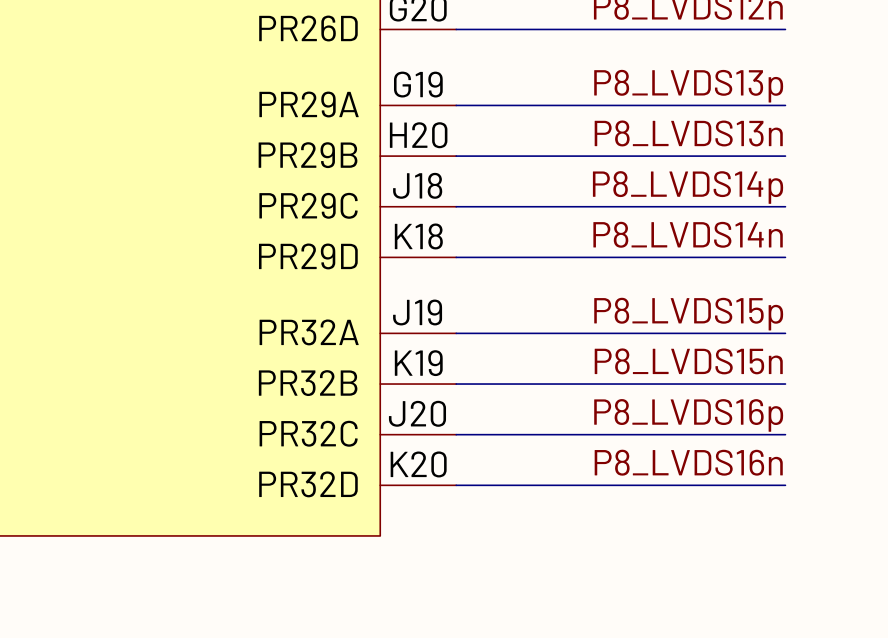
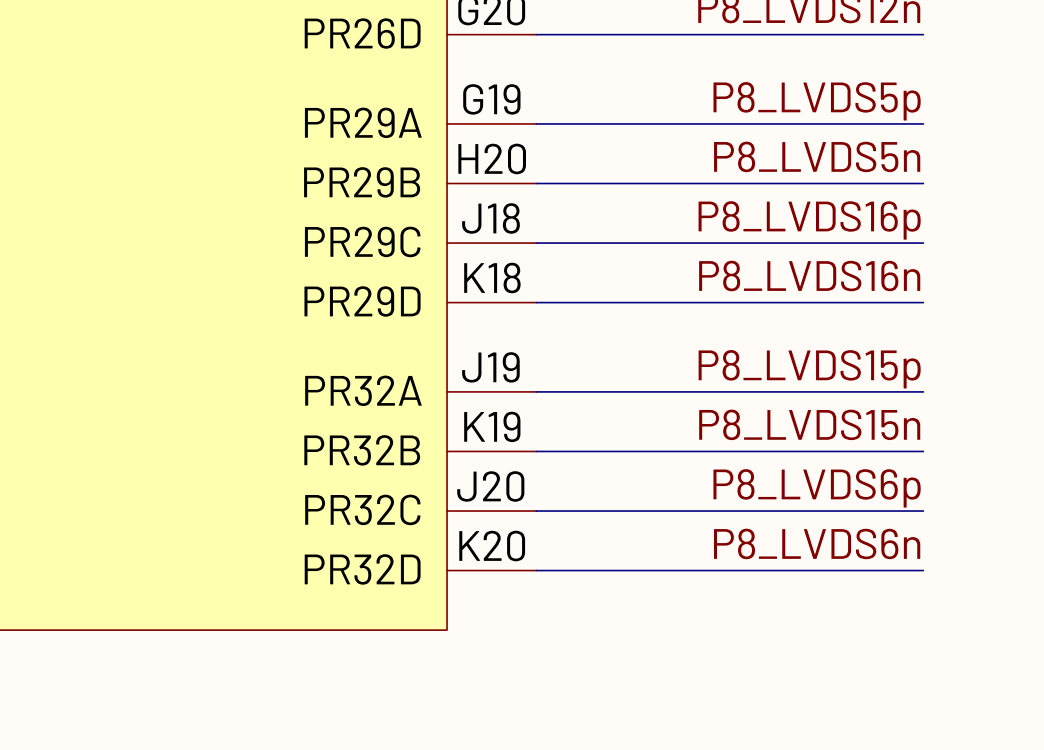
label: P8_LVDS13p (688, 86) -> P8_LVDS5p (817, 101)
label: P8_LVDS13n (688, 133) -> P8_LVDS5n (817, 156)
label: P8_LVDS14p (688, 187) -> P8_LVDS16p (809, 220)
label: P8_LVDS14n (688, 234) -> P8_LVDS16n (809, 275)
label: P8_LVDS16p (688, 415) -> P8_LVDS6p (817, 488)
label: P8_LVDS16n (688, 462) -> P8_LVDS6n (817, 543)

